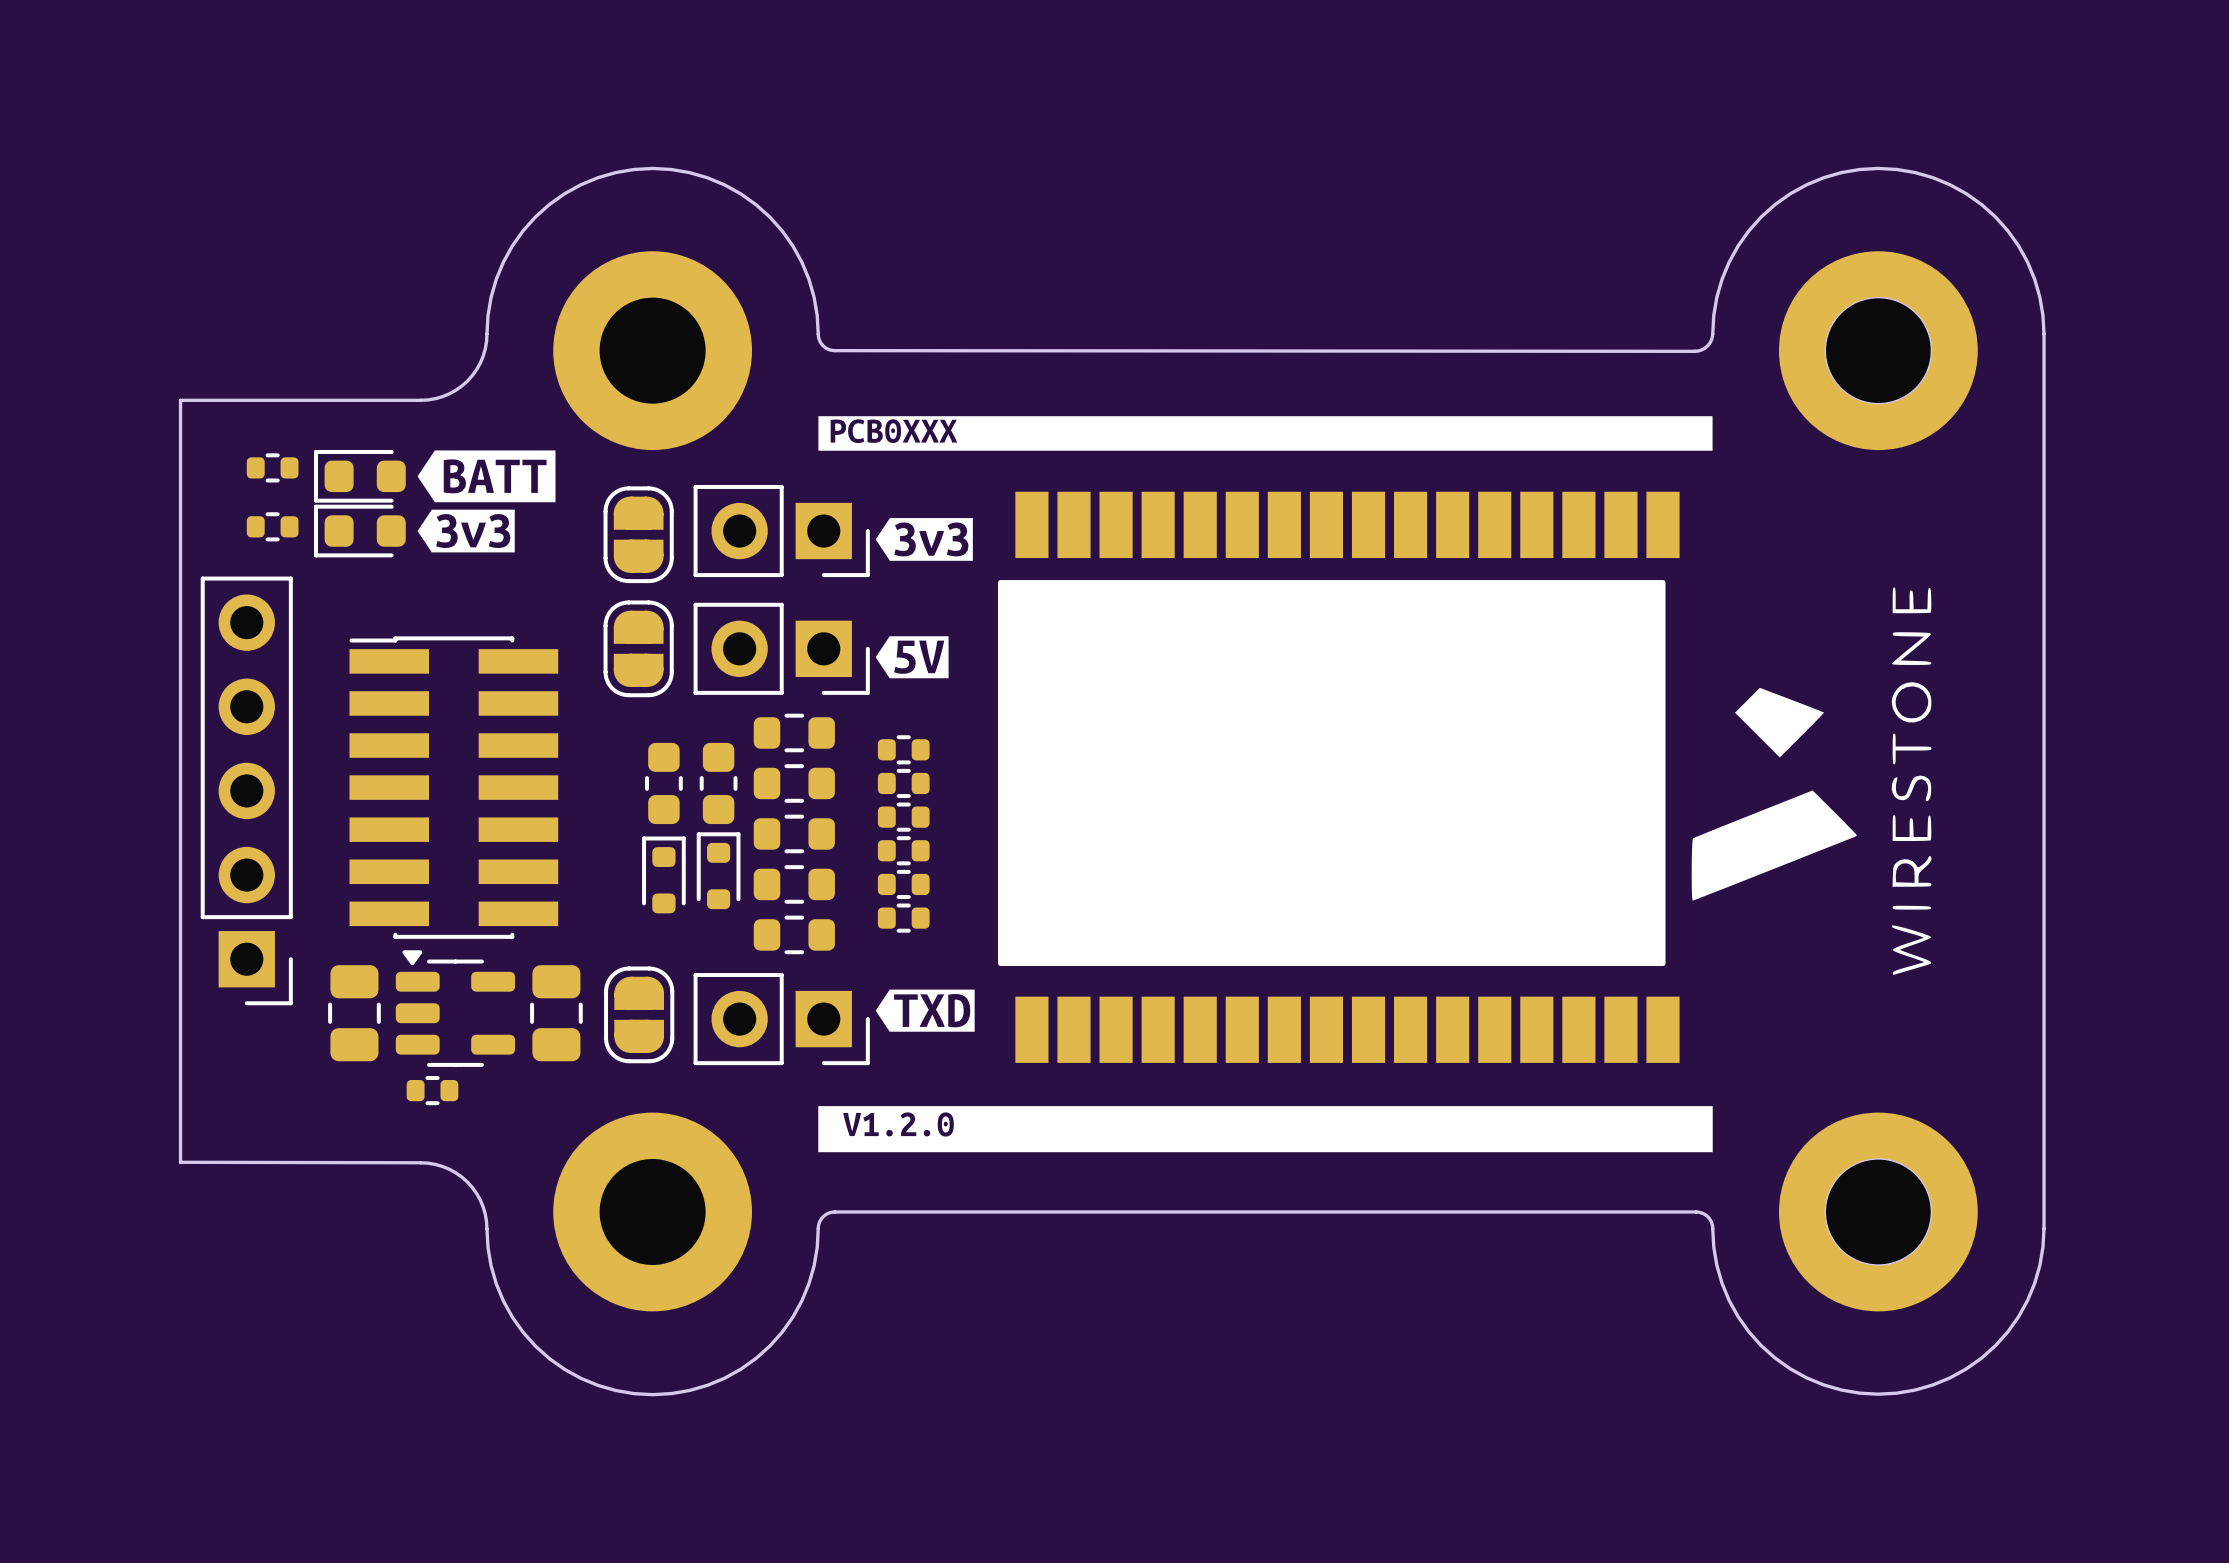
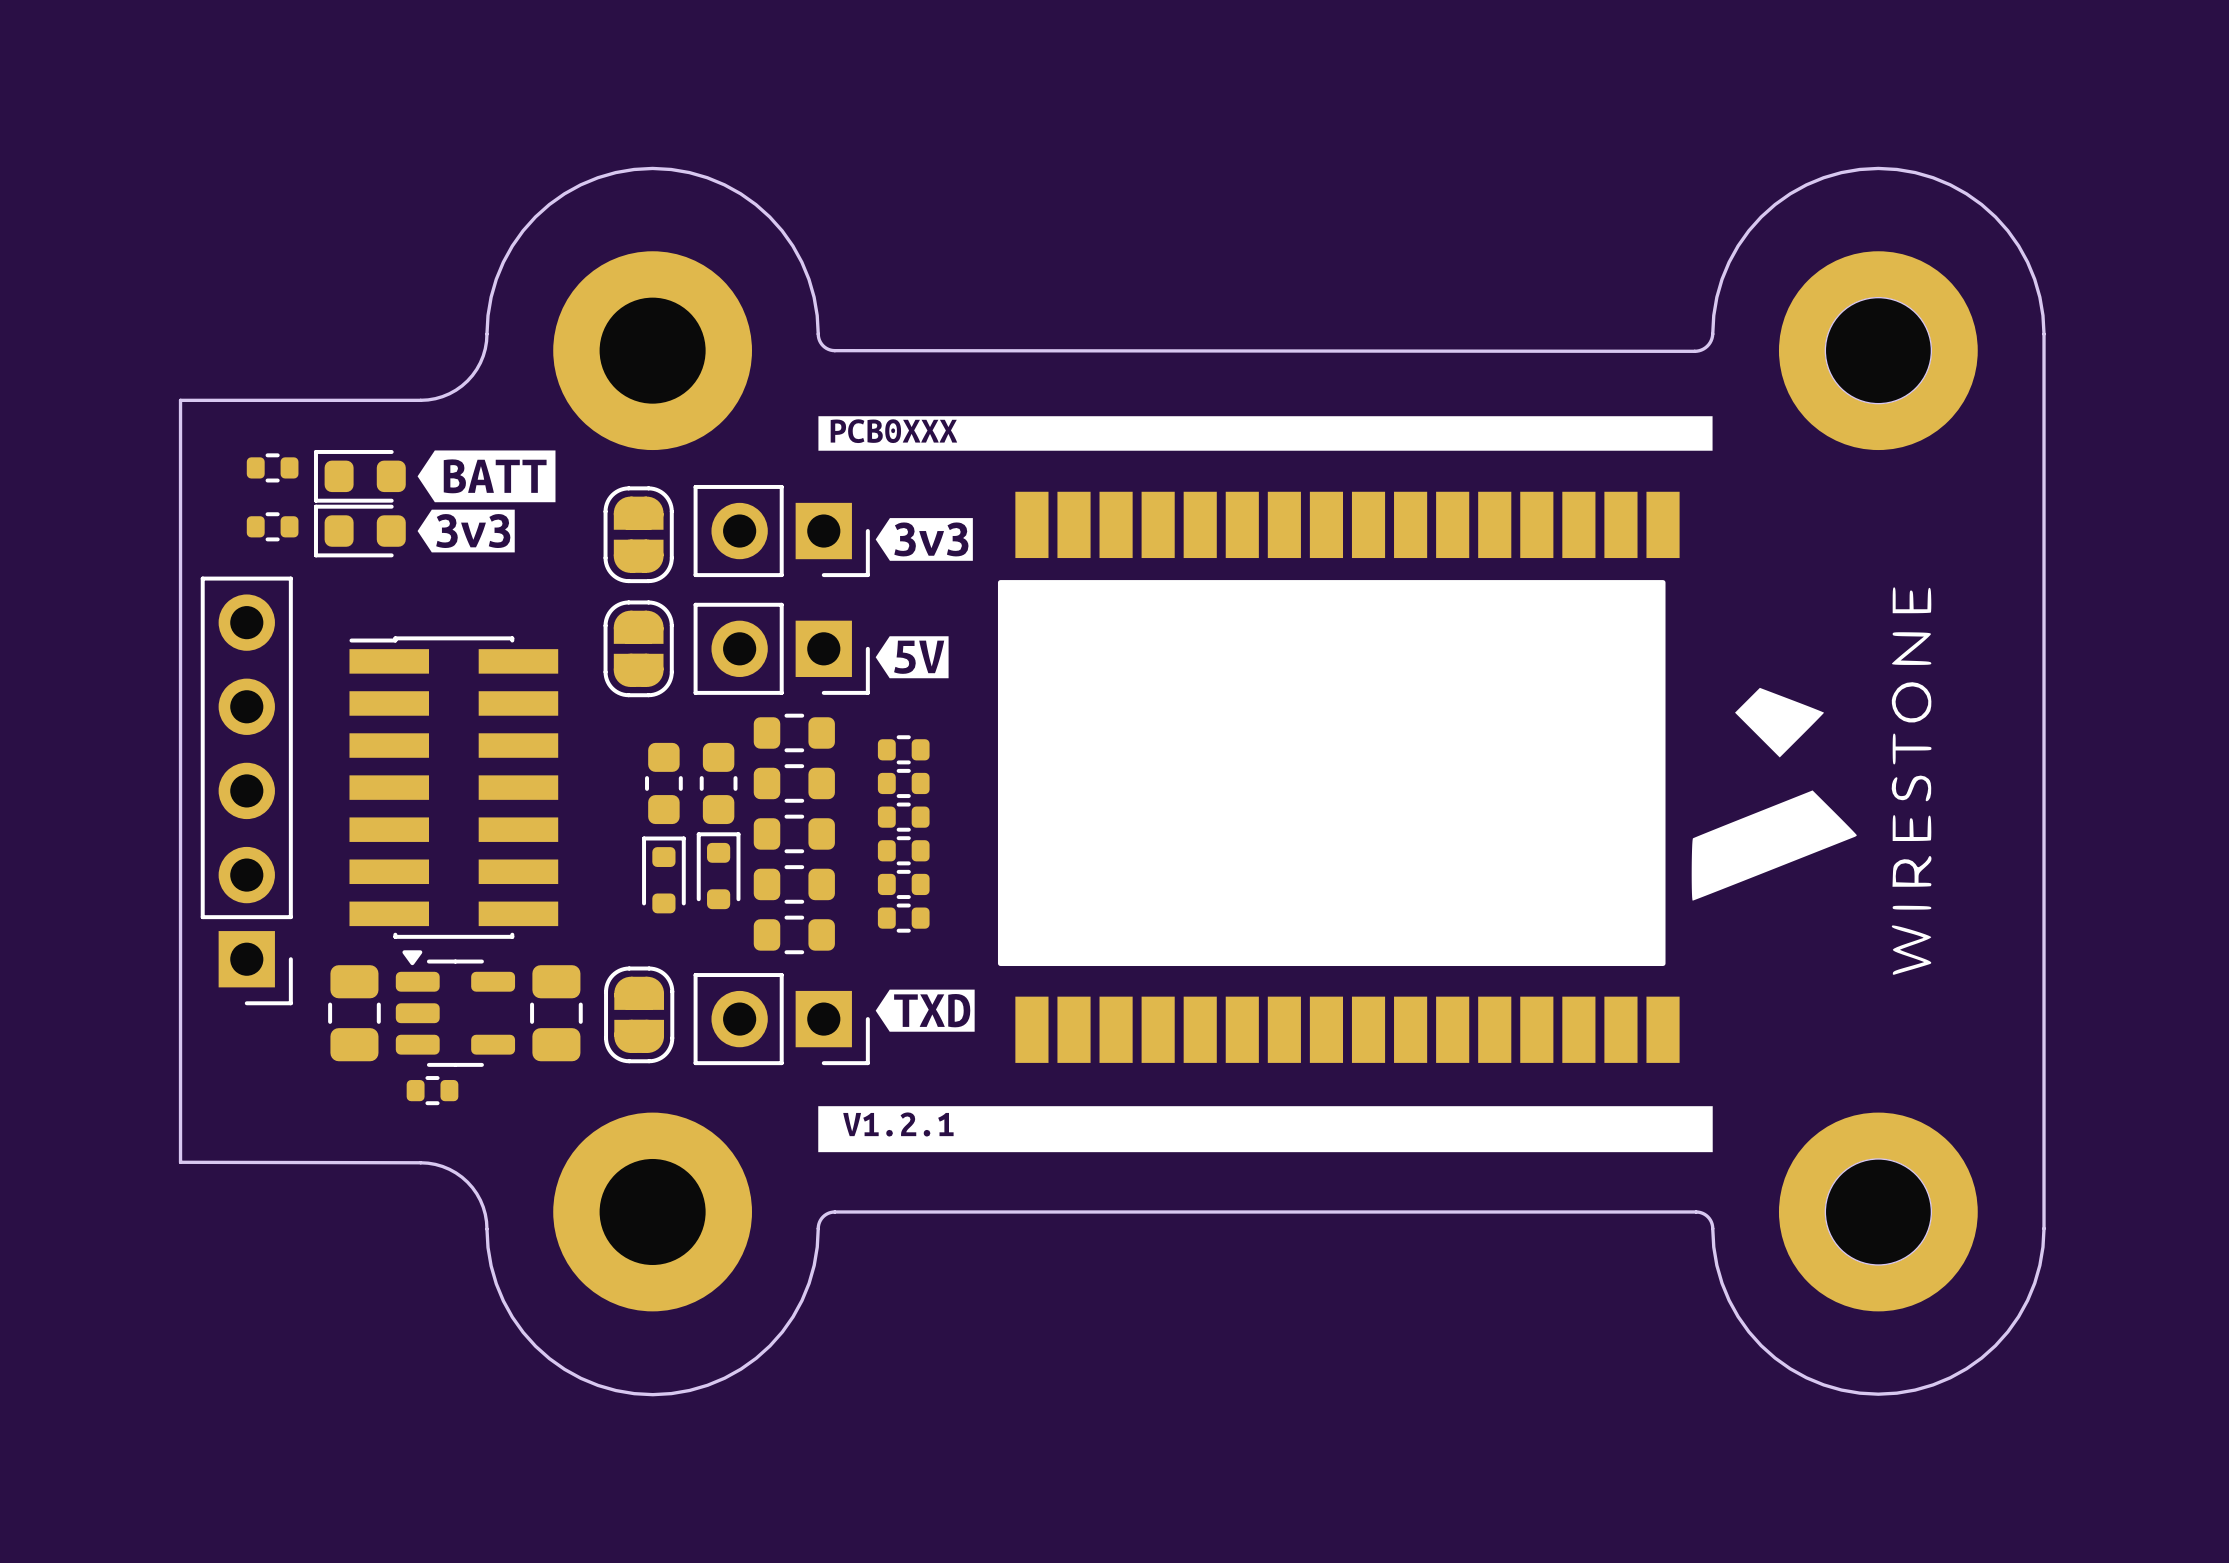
drawing shape: [818, 1106, 1713, 1153] -> [818, 1106, 1713, 1153]

